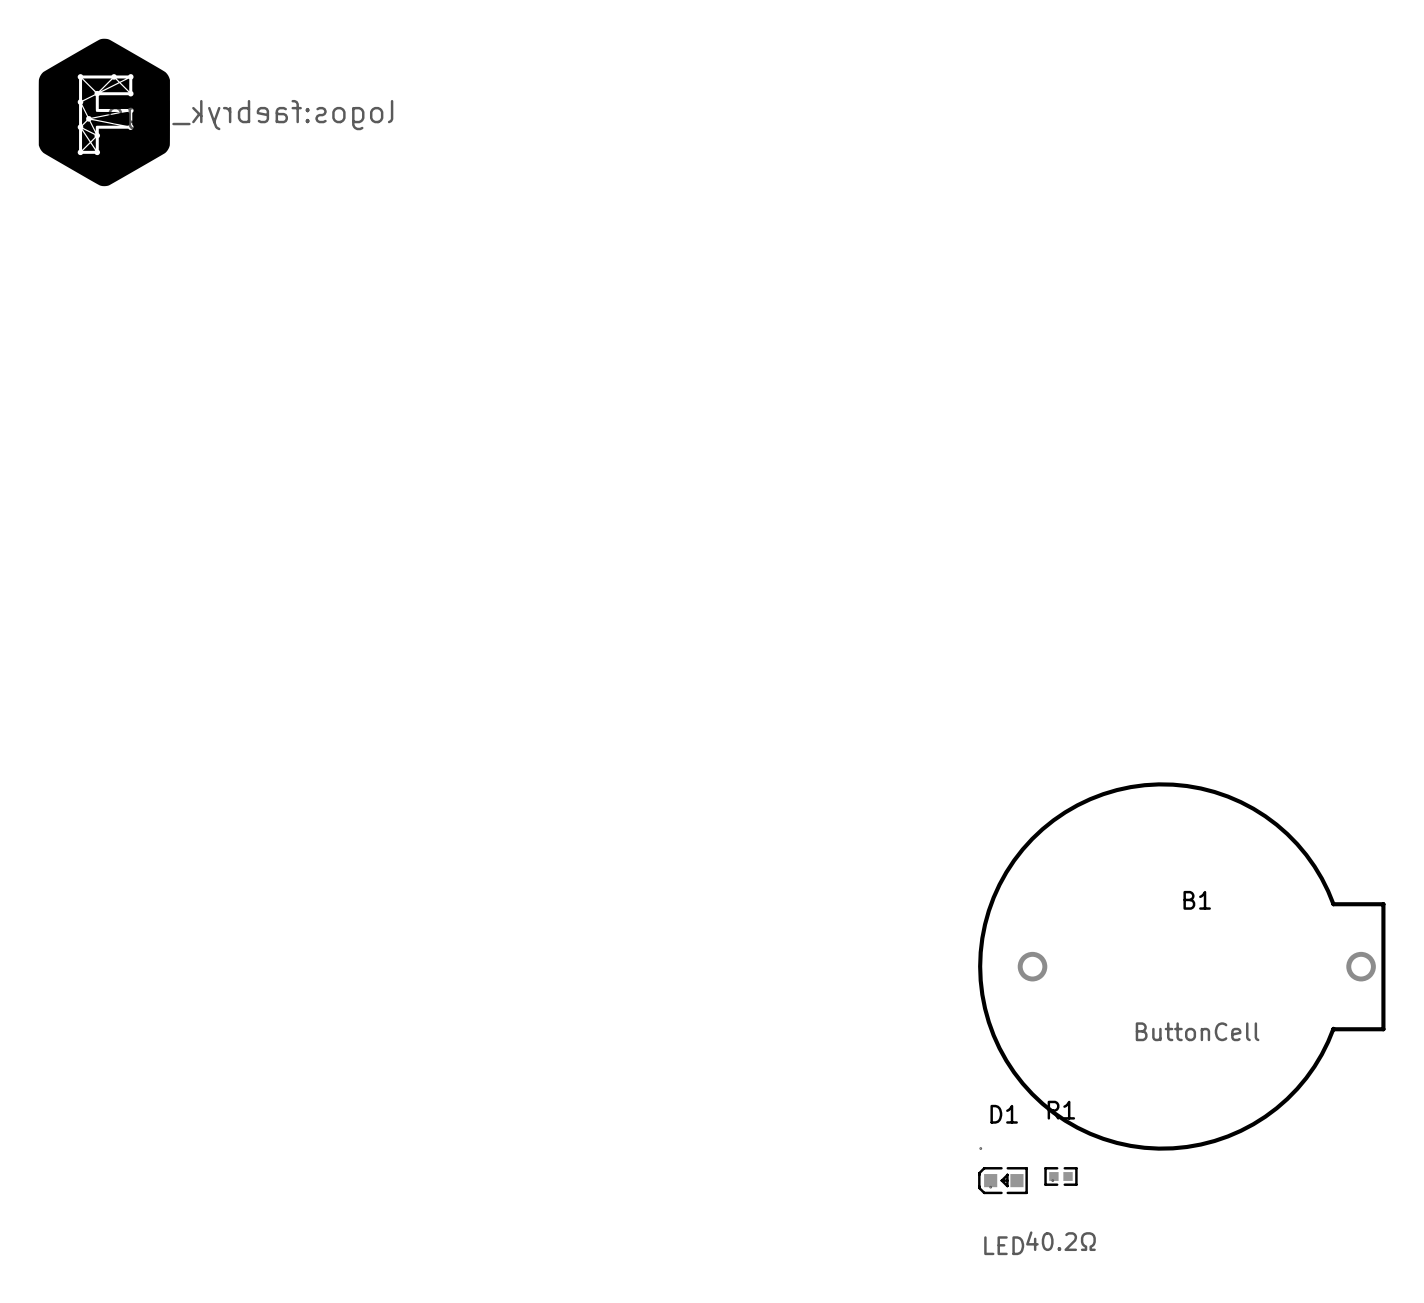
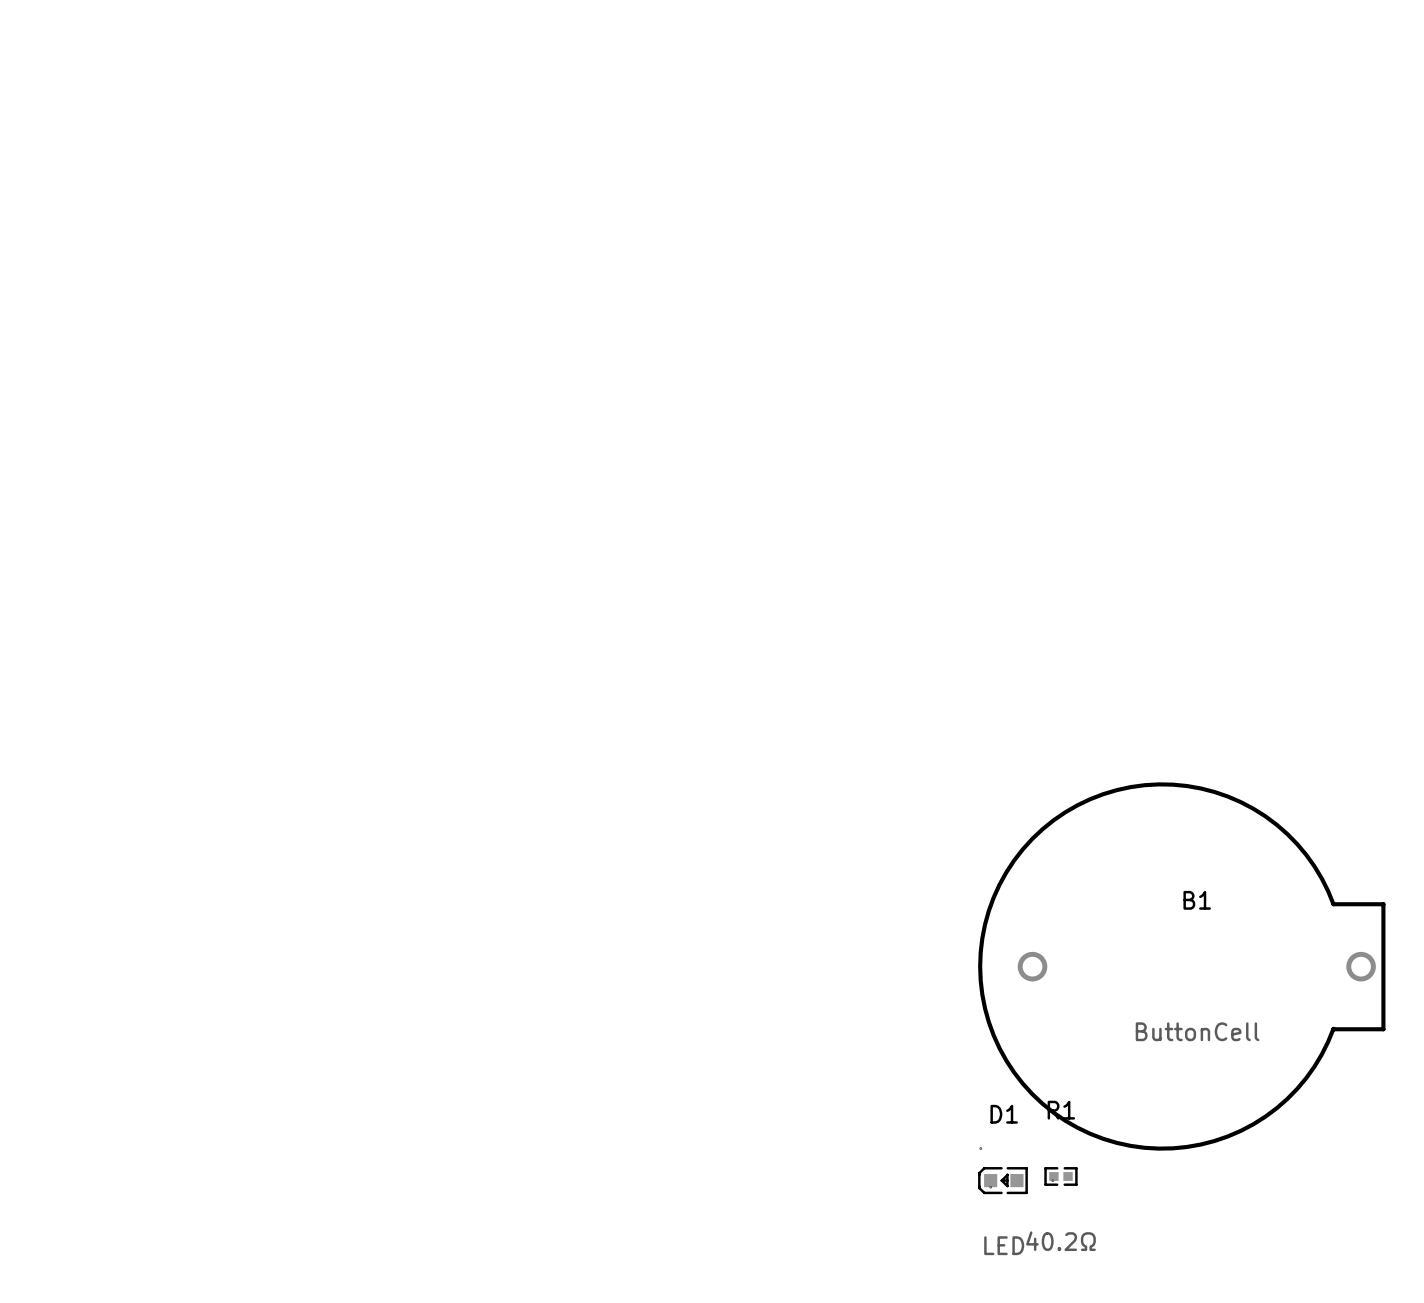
drawing: [38, 38, 170, 187] -> none

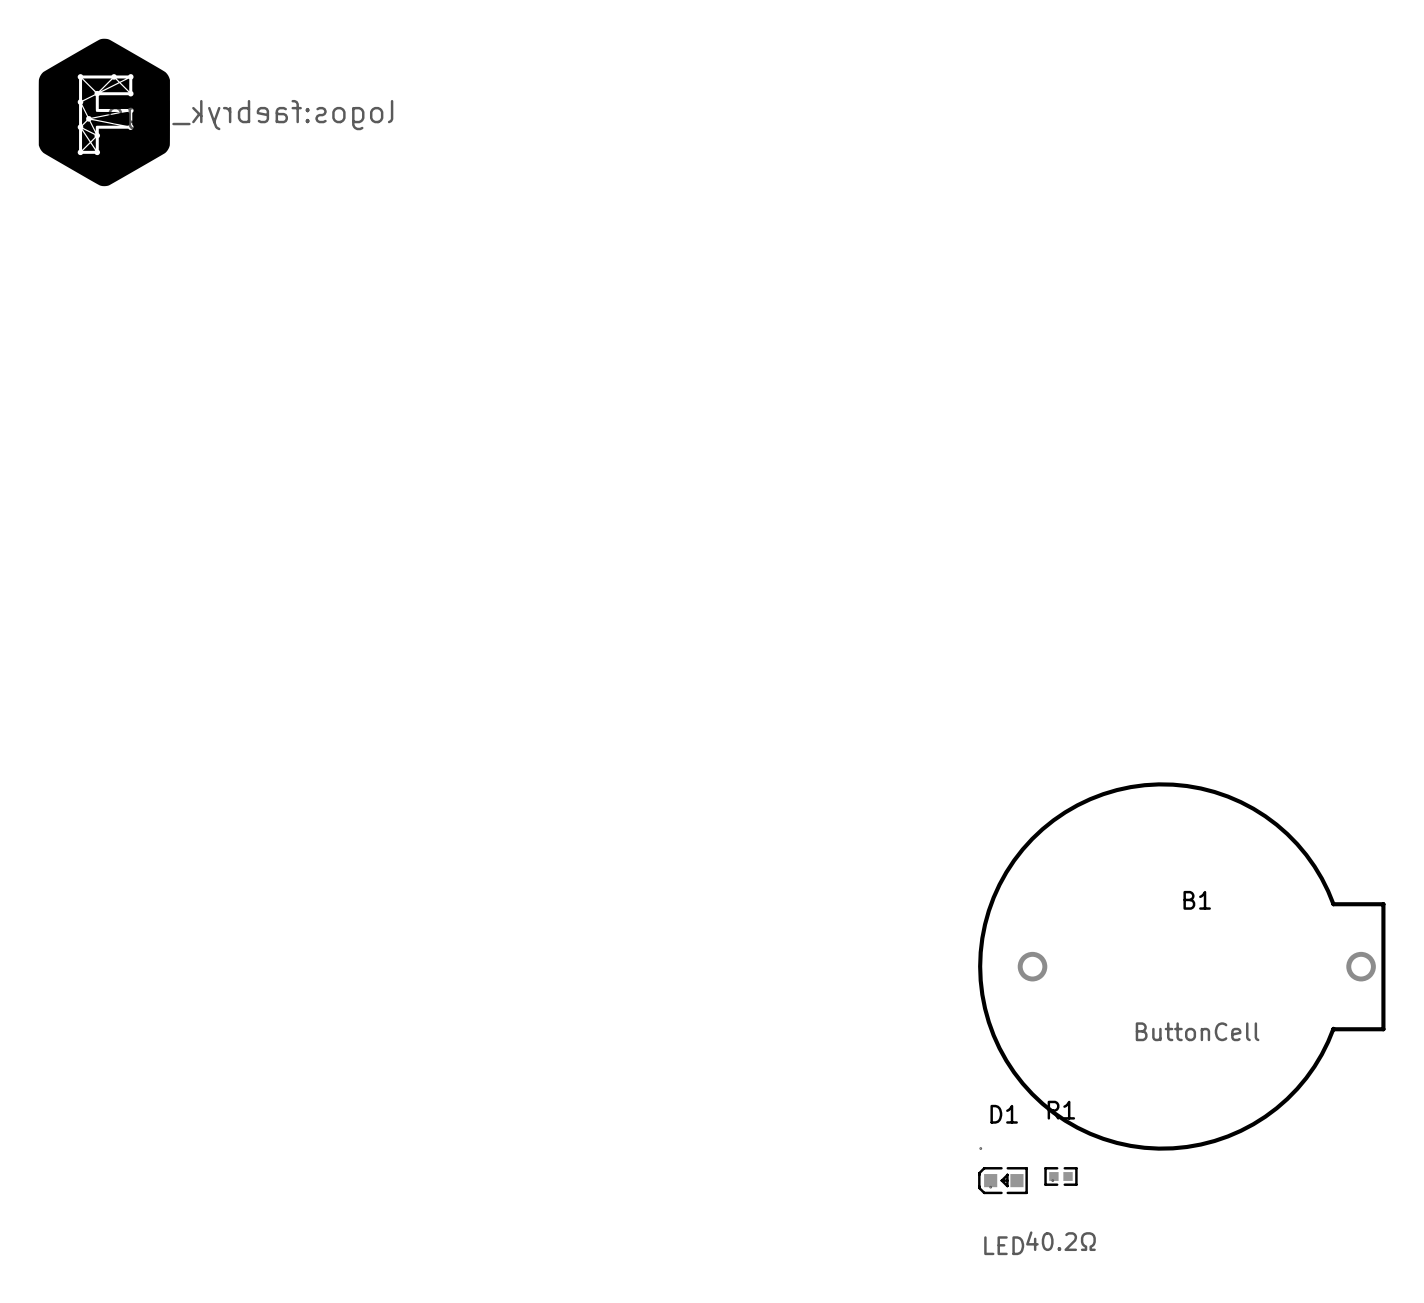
drawing: none -> [38, 38, 170, 187]

